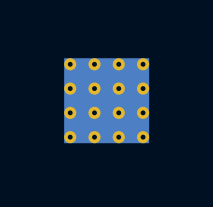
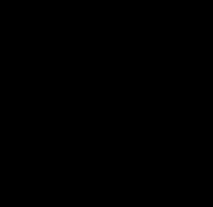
part: (106, 100) -> none

